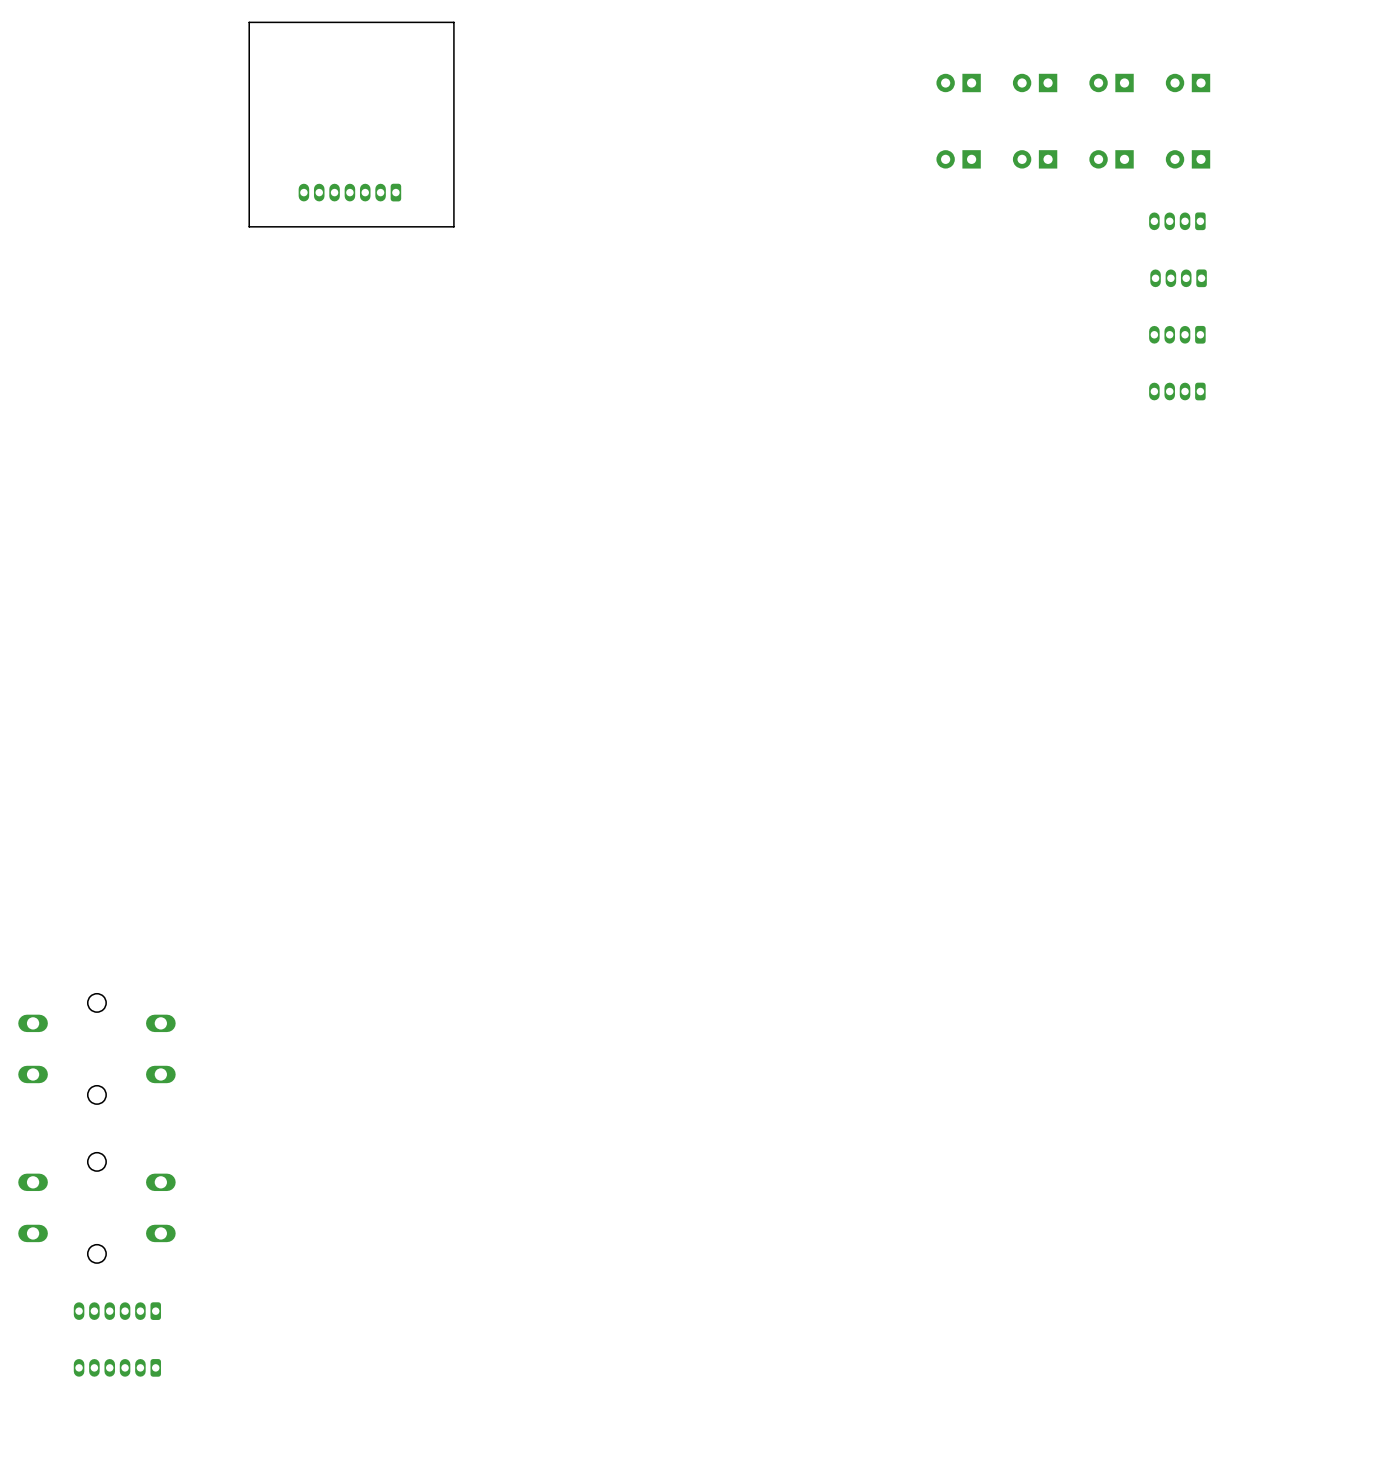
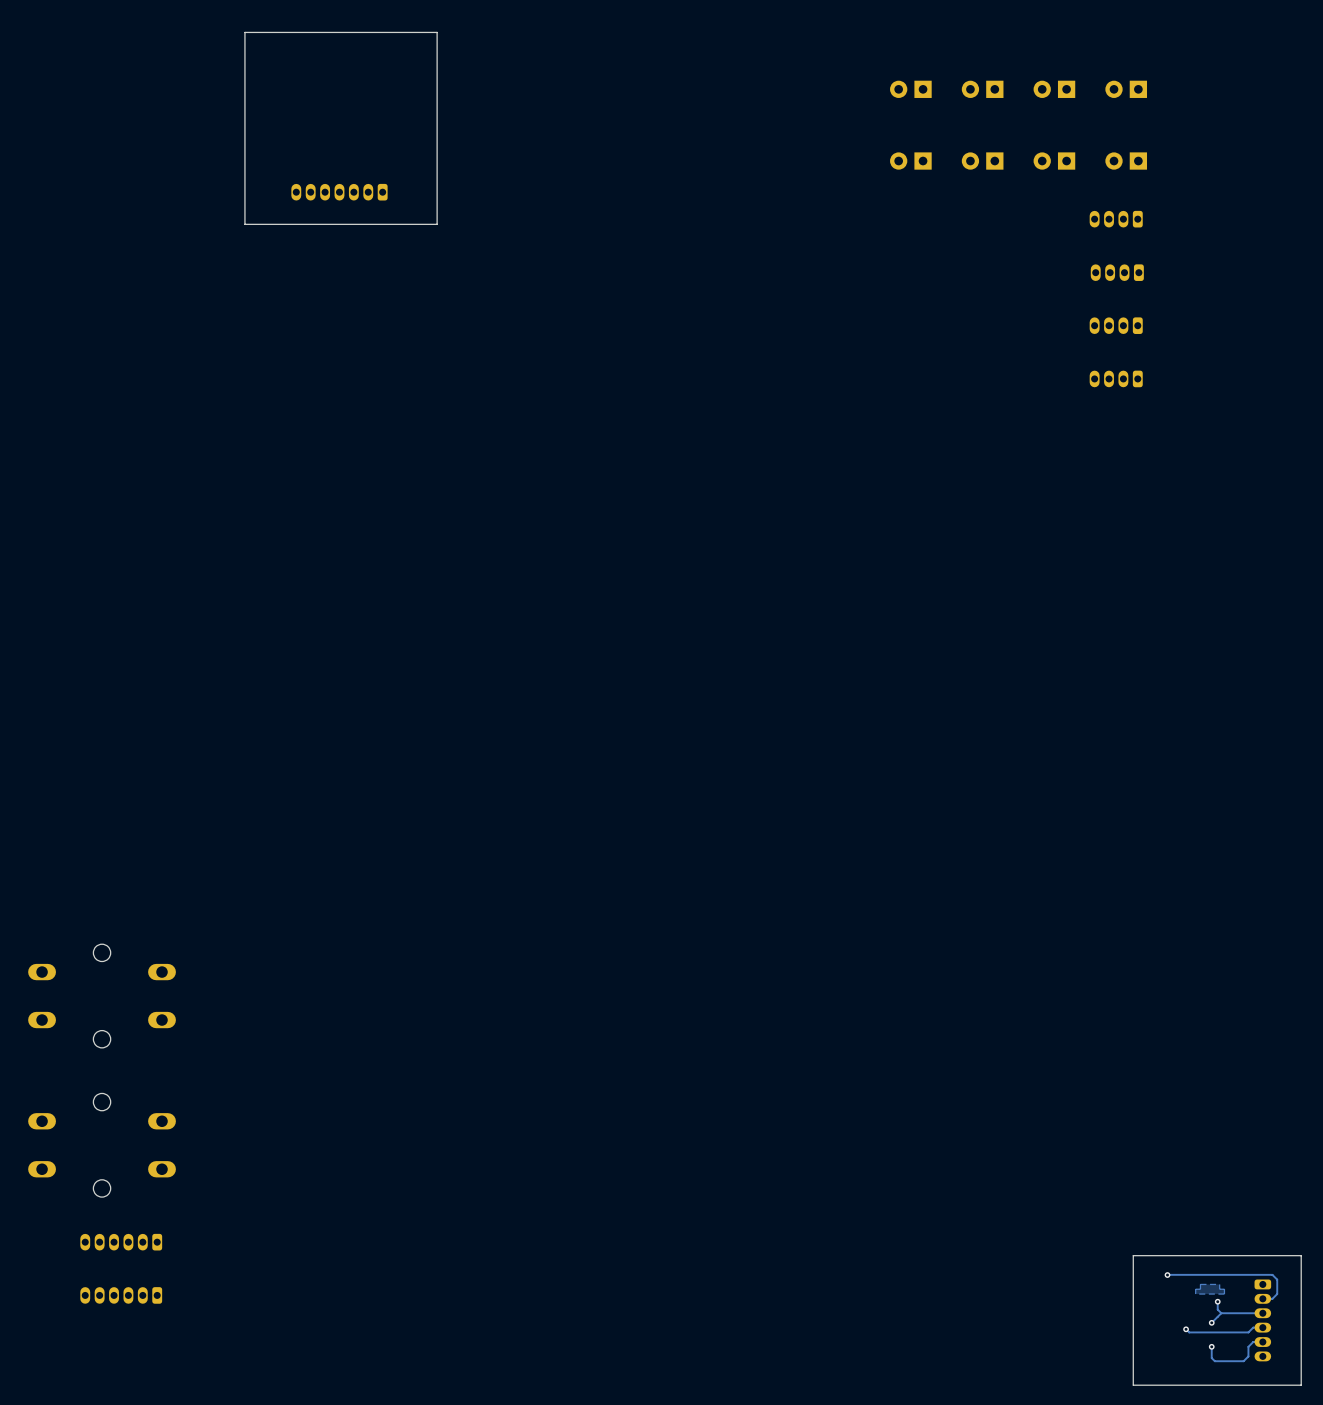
board edge: none -> (1301, 1255) (1133, 1255) (1133, 1385) (1301, 1385) (1301, 1255)
track: none -> (1167, 1275) (1272, 1274) (1277, 1279) (1277, 1294) (1272, 1298) (1262, 1298)
via: none -> (1167, 1275)
zone outline: none -> (1219, 1284) (1200, 1284) (1200, 1289) (1195, 1289) (1195, 1294) (1224, 1294) (1224, 1289) (1219, 1289) (1219, 1284)
track: none -> (1217, 1301) (1217, 1309) (1221, 1313)
via: none -> (1217, 1301)
track: none -> (1221, 1313) (1211, 1322)
track: none -> (1262, 1313) (1221, 1313)
part: none -> (1262, 1320)
via: none -> (1211, 1322)
track: none -> (1262, 1327) (1253, 1327) (1248, 1332) (1189, 1332) (1186, 1329)
via: none -> (1186, 1329)
track: none -> (1262, 1342) (1253, 1342) (1248, 1346) (1248, 1356) (1243, 1361) (1214, 1361) (1211, 1358) (1211, 1346)
via: none -> (1211, 1346)

